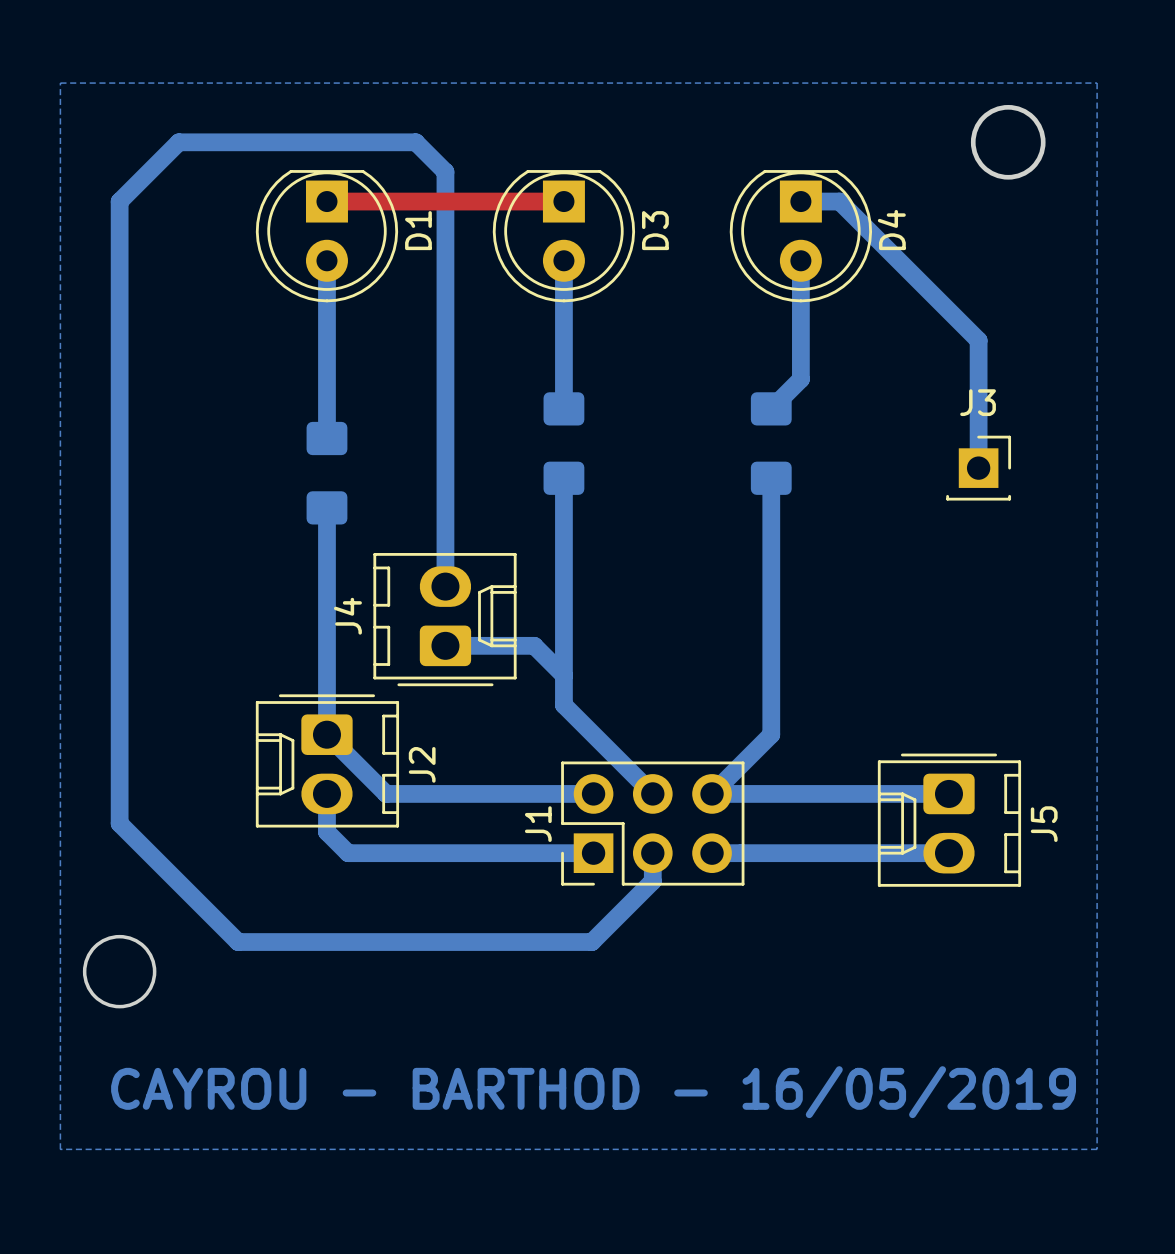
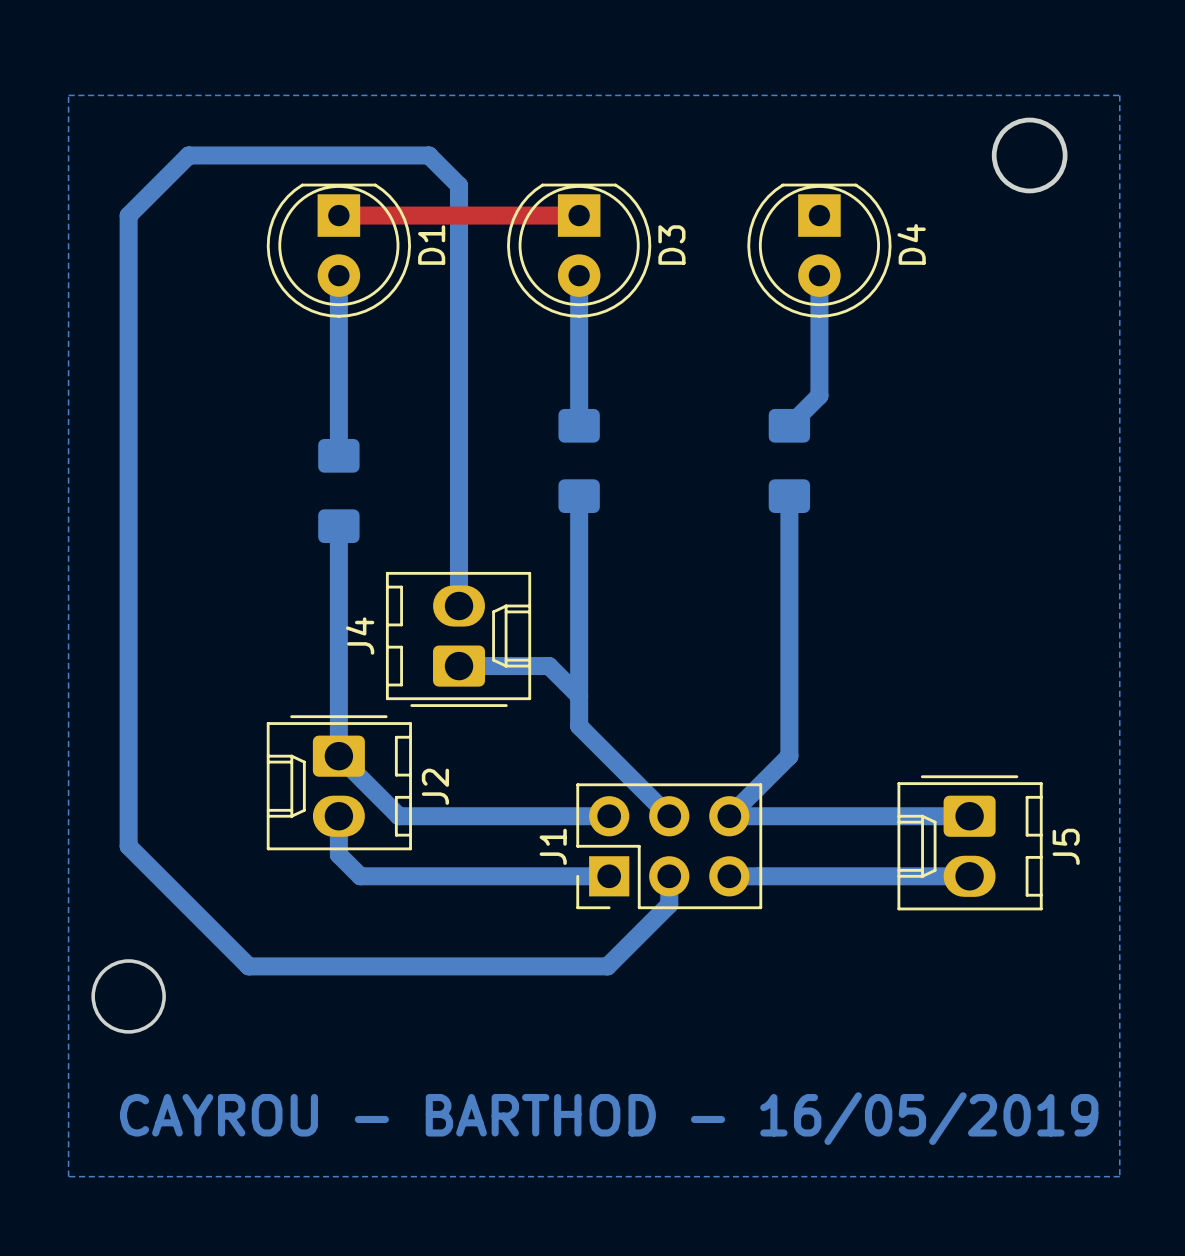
bottom track: (800, 201) (839, 201) (978, 340) (978, 468) -> none
J3: (978, 468) -> none

